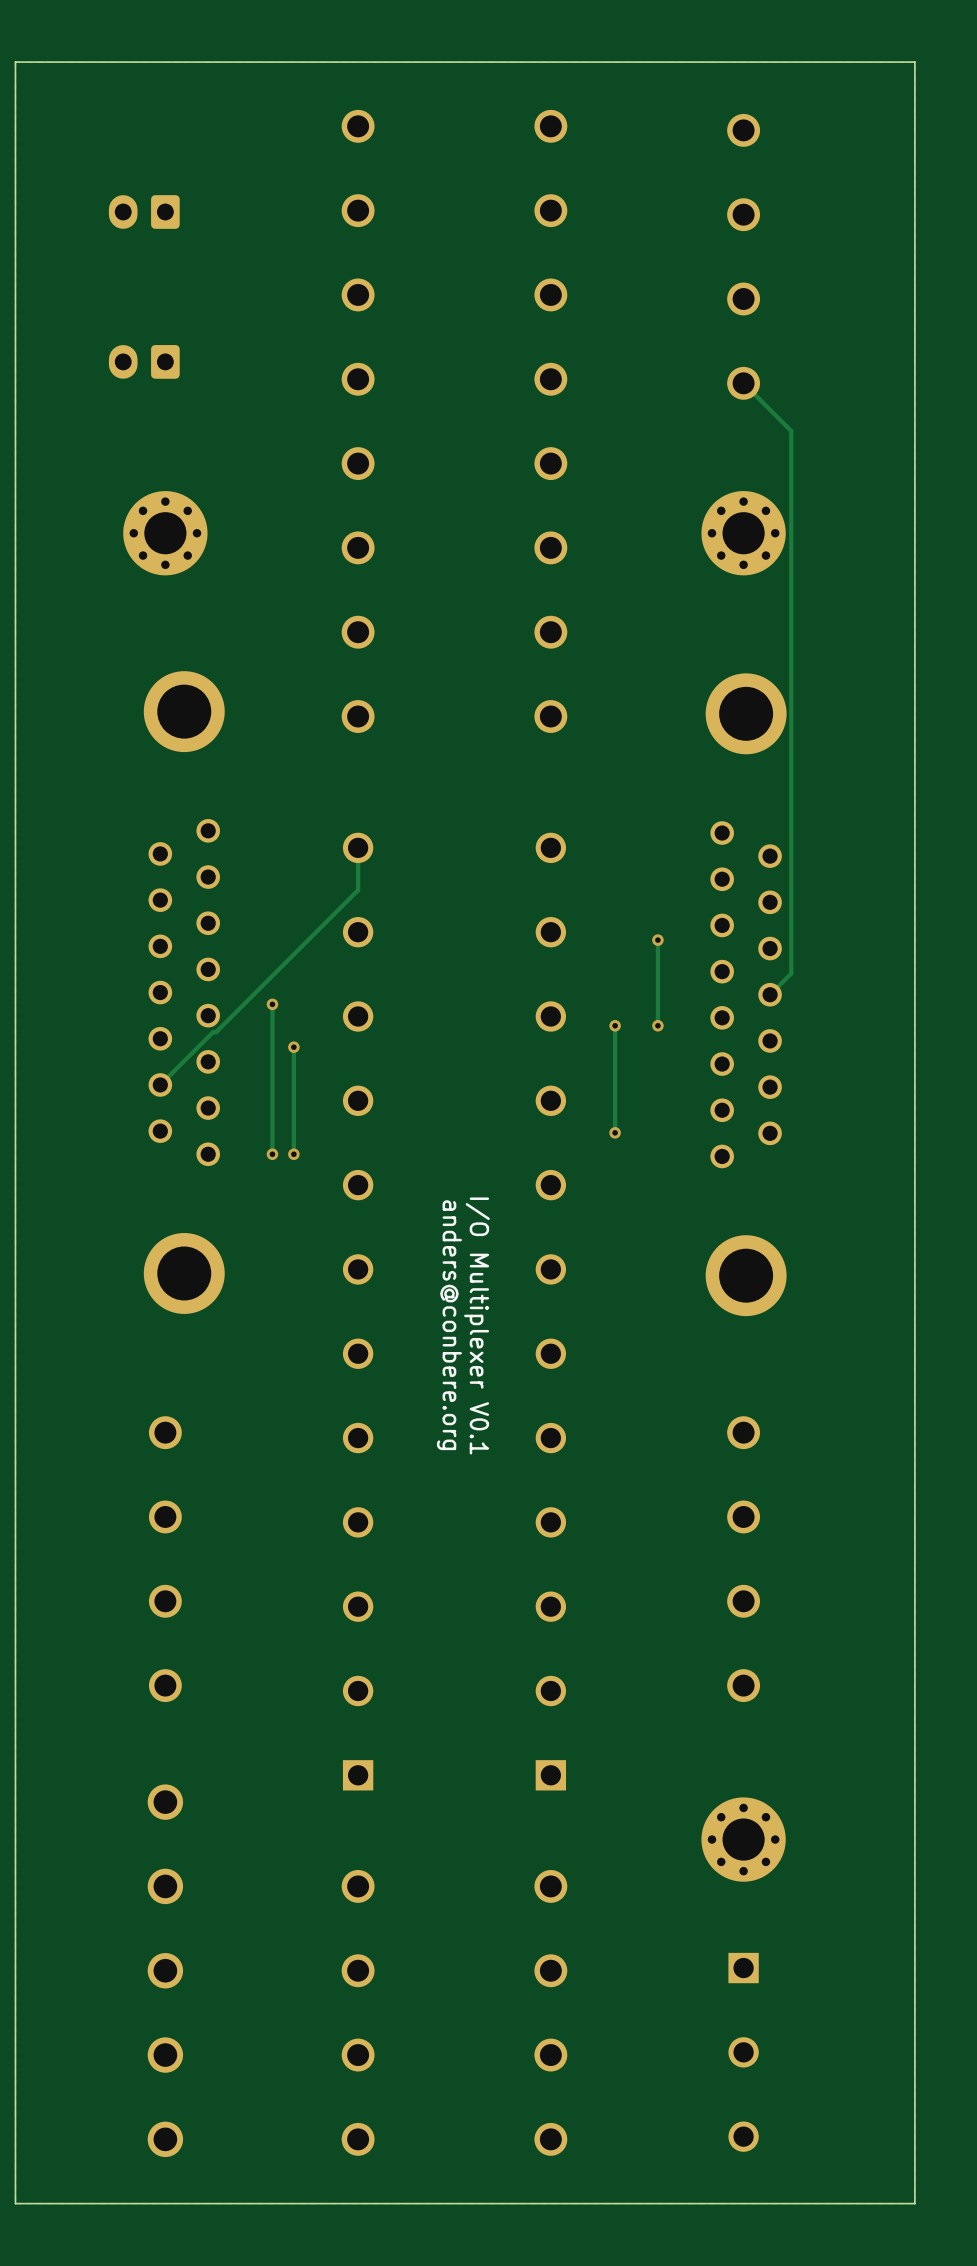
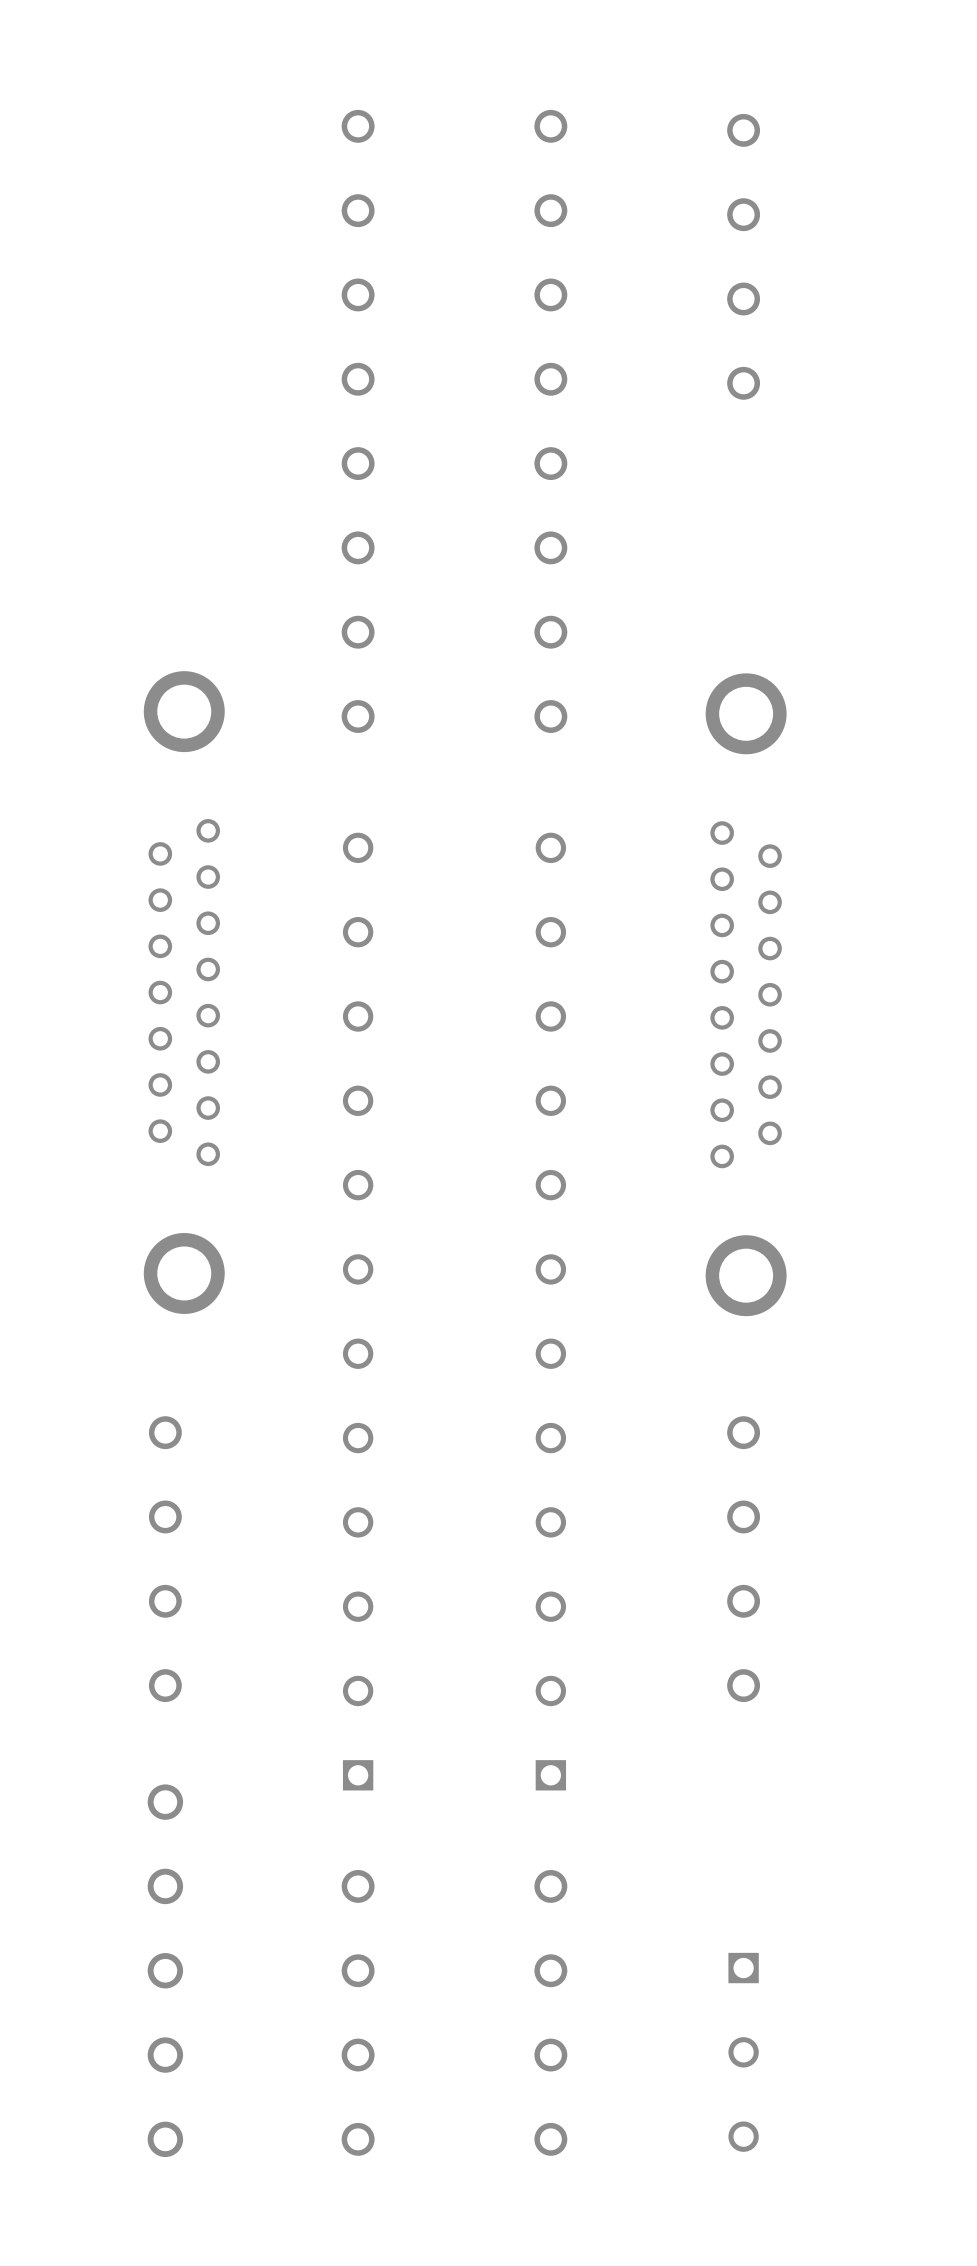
board edge: (914, 62) (914, 2203) (15, 2203) (15, 62) (914, 62) -> none
part: (144, 211) -> none
part: (144, 361) -> none
track: (743, 383) (791, 431) (791, 973) (770, 994) -> none
part: (165, 533) -> none
part: (743, 533) -> none
track: (358, 847) (358, 890) (216, 1032) (213, 1032) (160, 1084) -> none
track: (657, 940) (657, 1025) -> none
via: (657, 940) -> none
track: (272, 1004) (272, 1154) -> none
via: (272, 1004) -> none
track: (615, 1025) (615, 1132) -> none
via: (615, 1025) -> none
via: (657, 1025) -> none
track: (293, 1047) (293, 1154) -> none
via: (293, 1047) -> none
via: (615, 1132) -> none
via: (272, 1154) -> none
via: (293, 1154) -> none
text: anders@conbere.org (449, 1325) -> none
text: I/O Multiplexer V0.1 (476, 1325) -> none
part: (743, 1839) -> none

